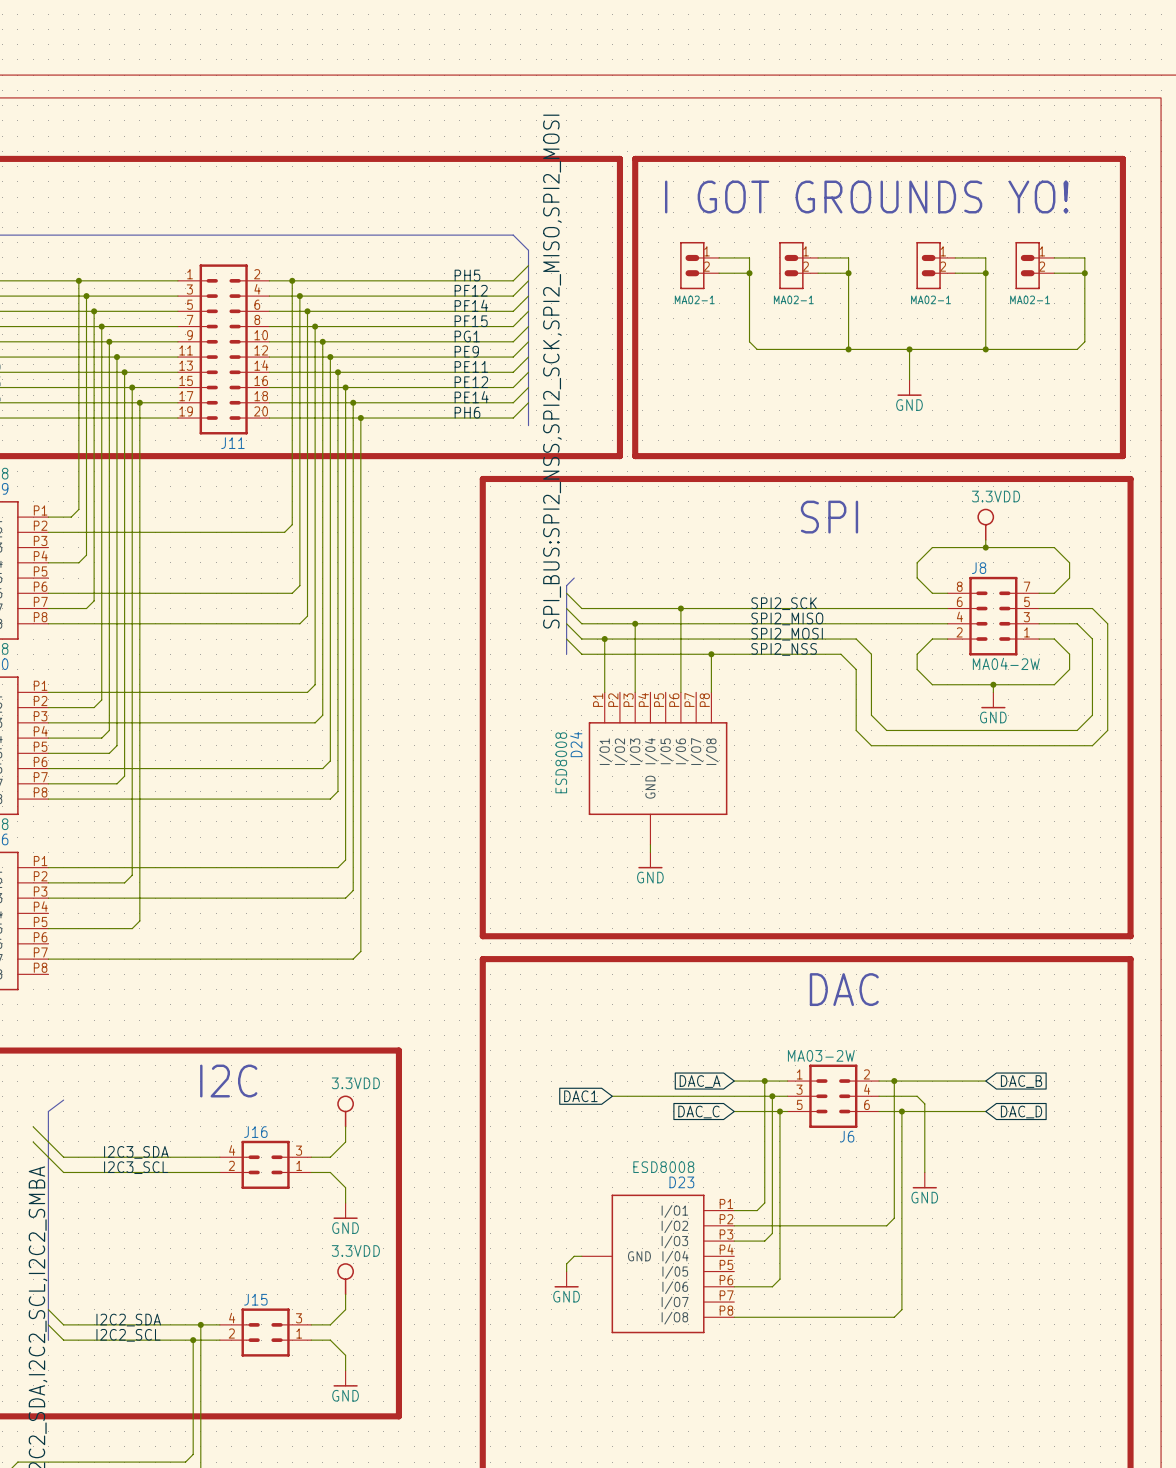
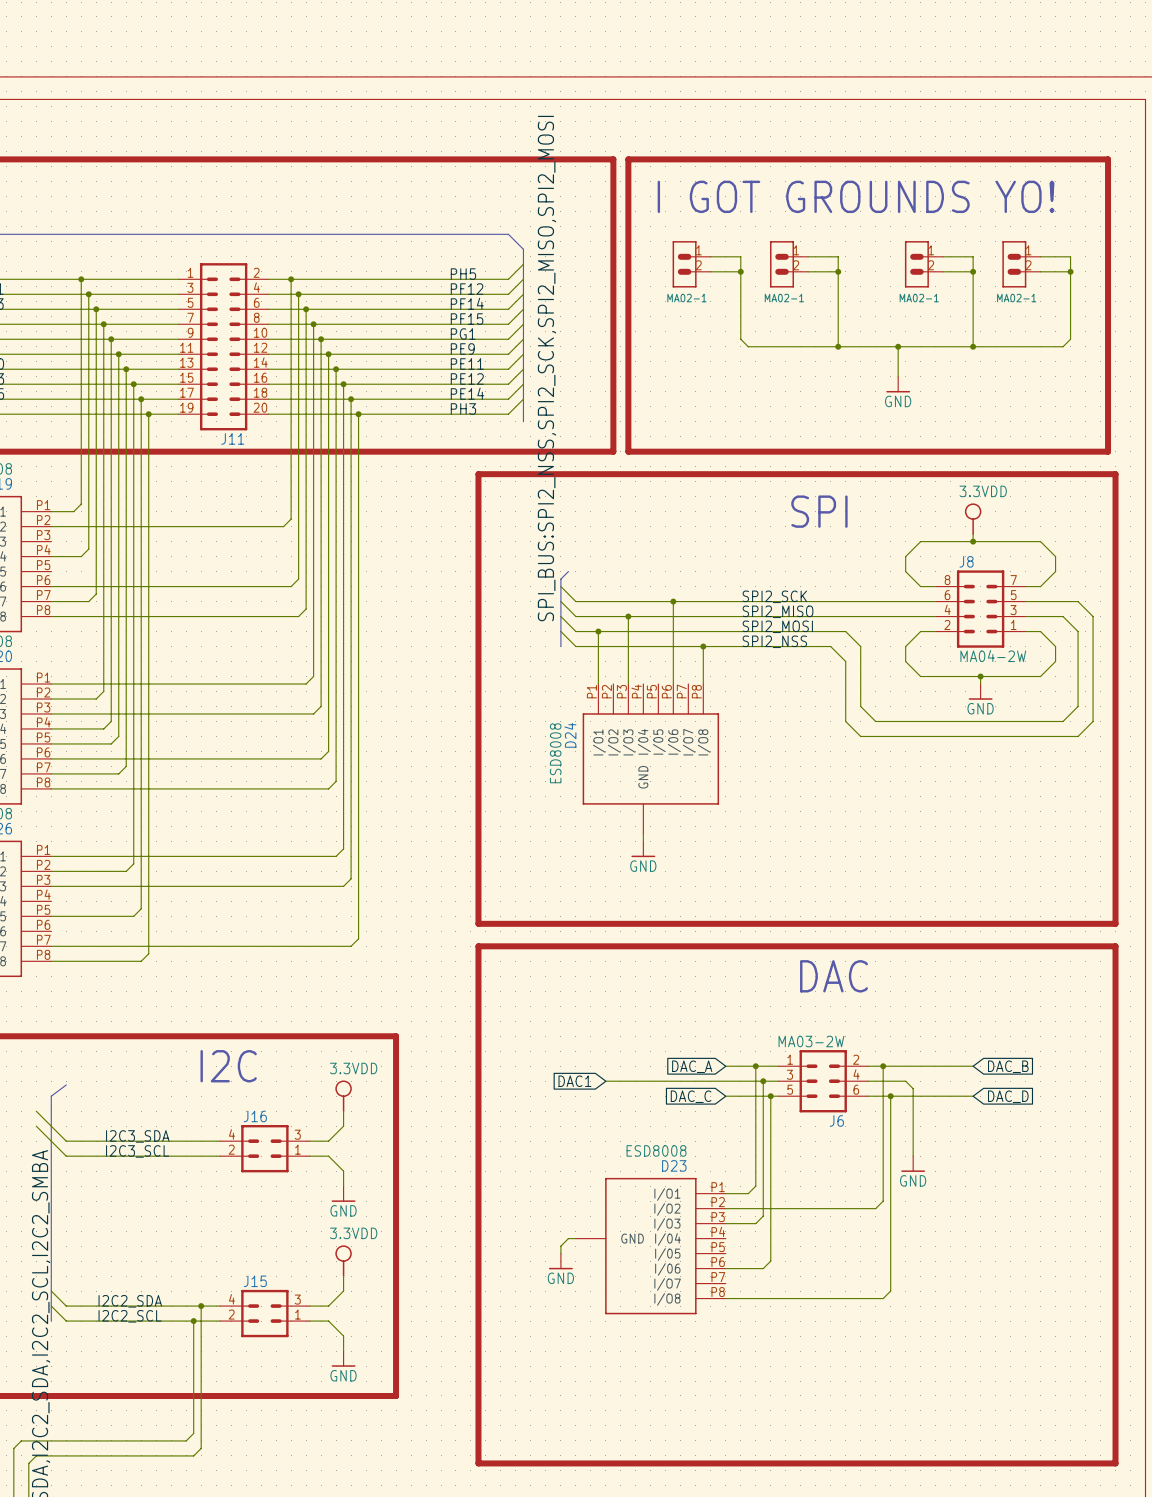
label: PH6 (467, 412) -> PH3 (463, 408)
wire: none -> (148, 414) (148, 953) (141, 961) (51, 961)
junction: none -> (148, 414)

